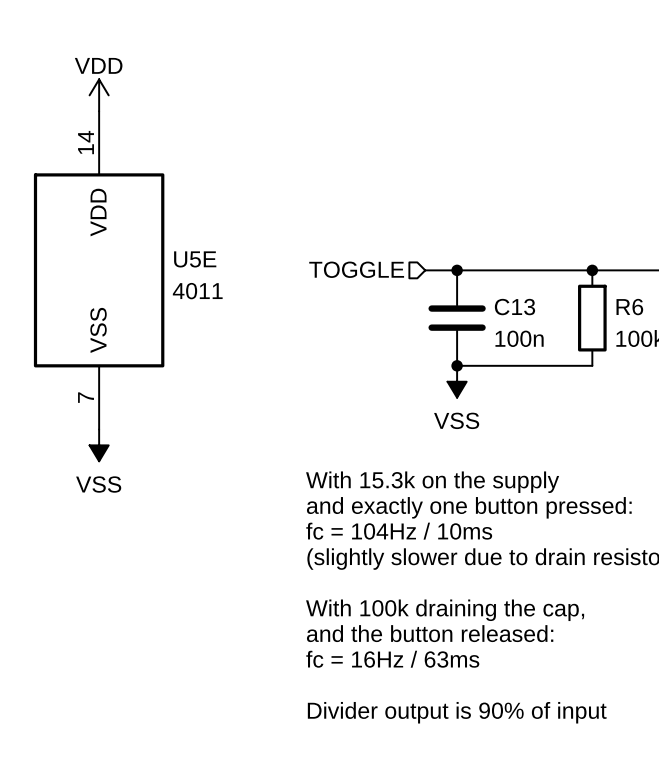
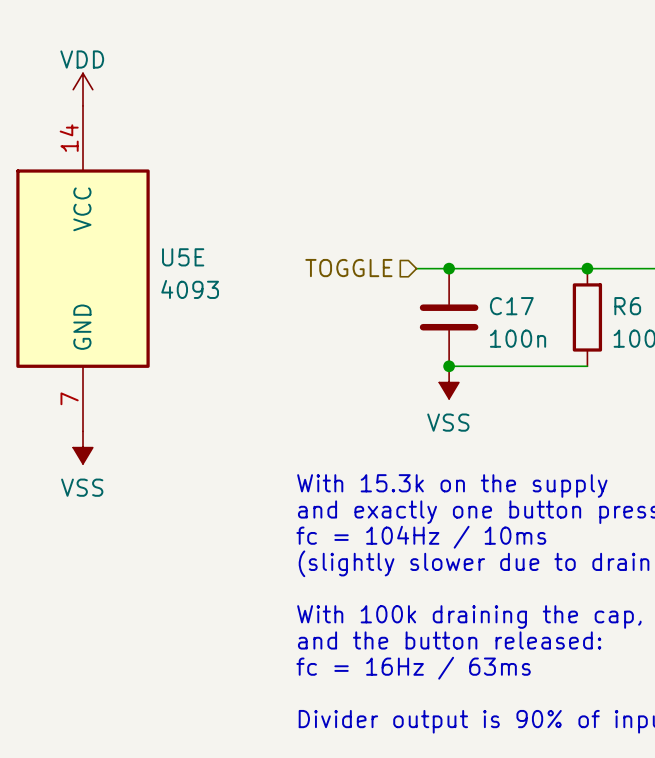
U5E pin name: VDD (98, 212) -> VCC (82, 209)
U5E value: 4011 (197, 291) -> 4093 (190, 289)
C13 name: C13 (514, 307) -> C17 (511, 306)
U5E pin name: VSS (98, 330) -> GND (82, 327)

